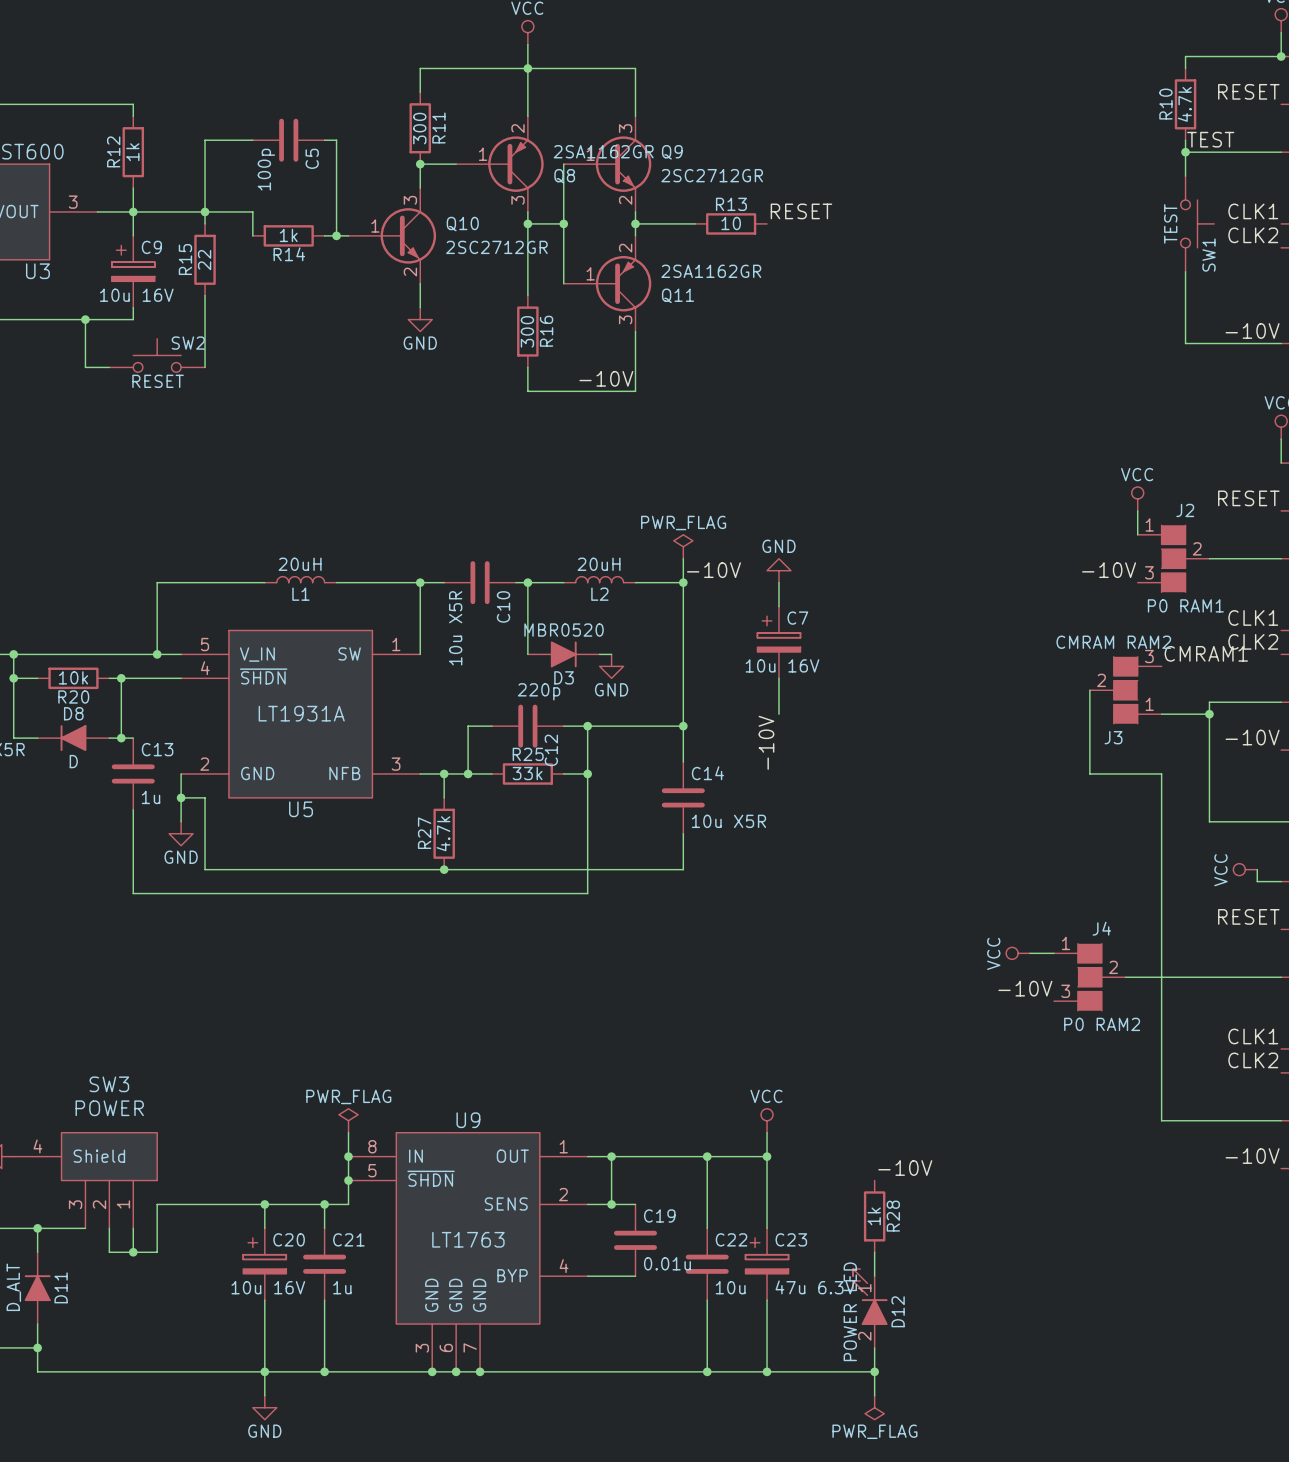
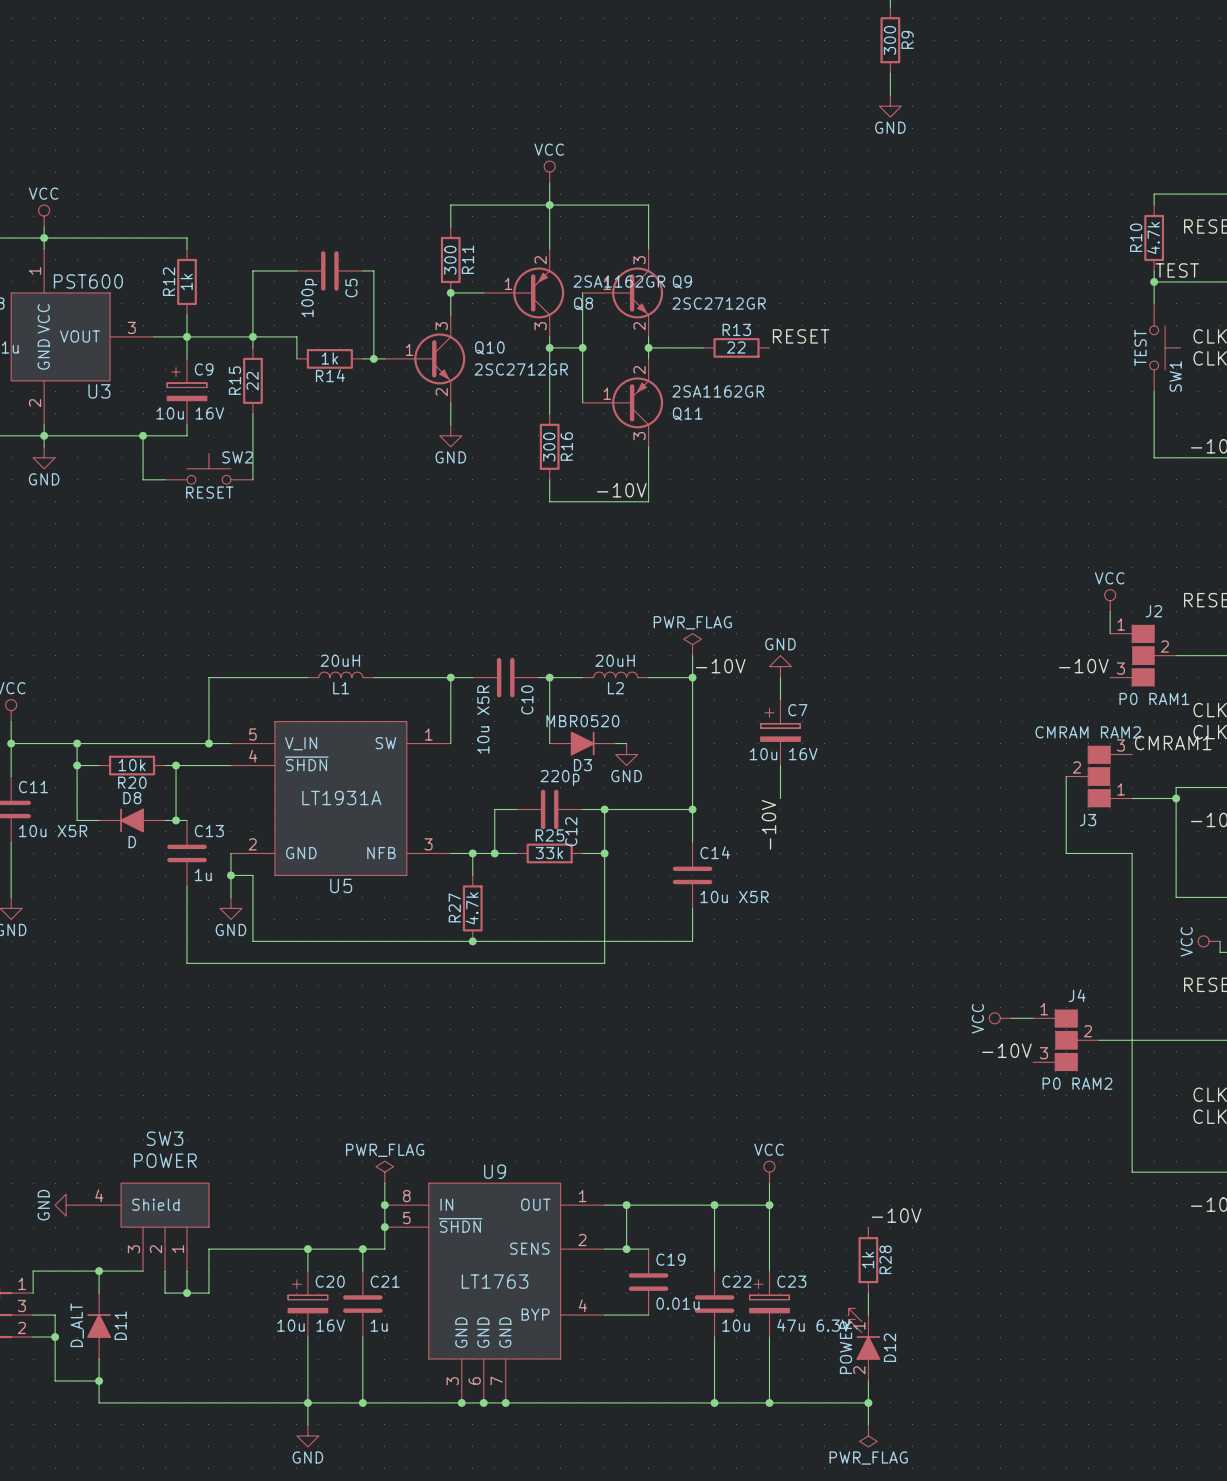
R13 value: 10 (731, 223) -> 22 (736, 347)
D12 value: POWER LED (850, 1311) -> POWER (846, 1347)

